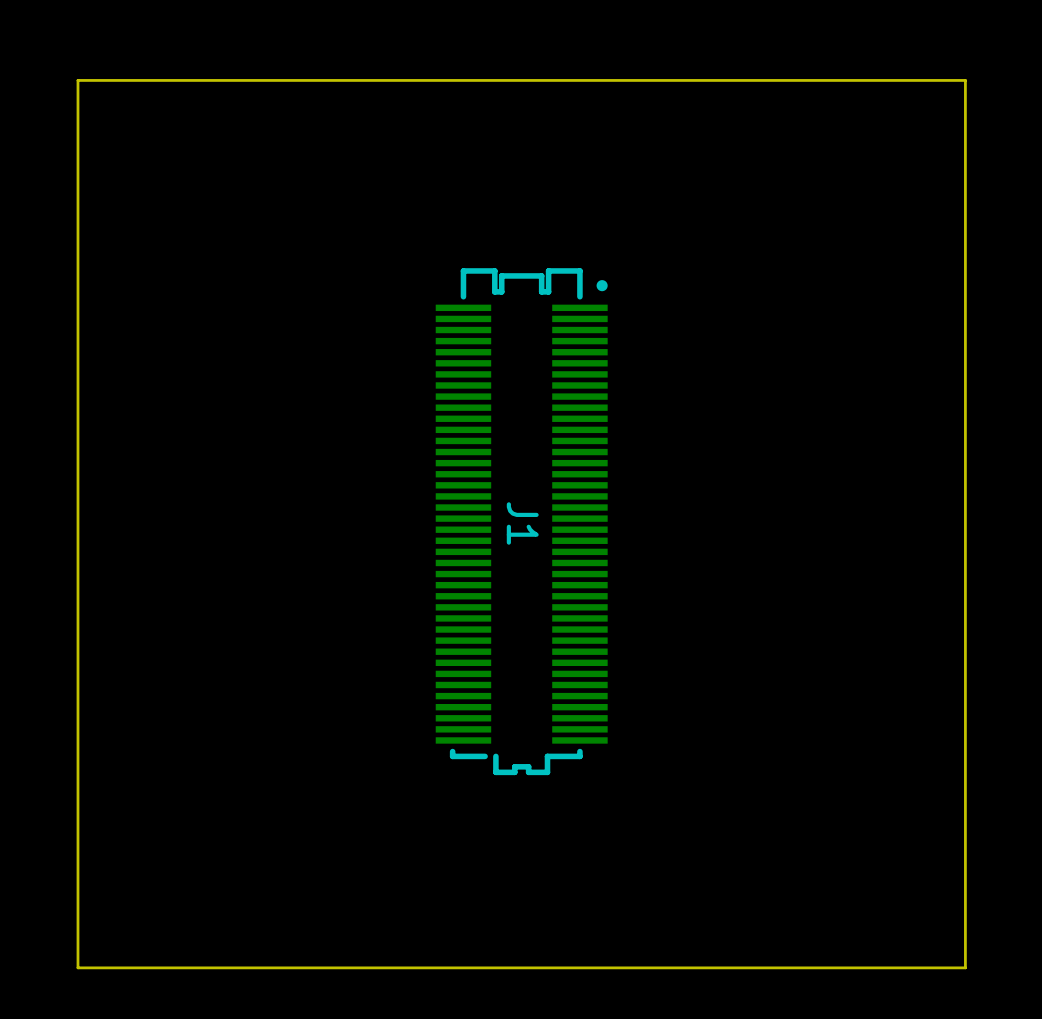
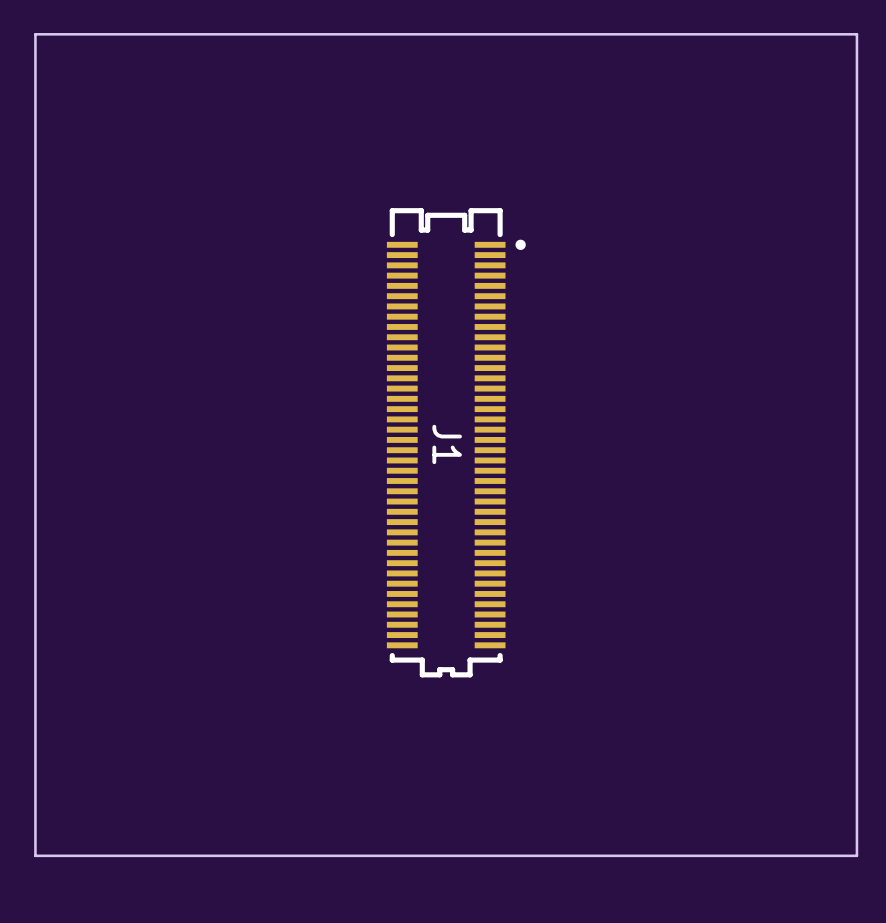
J1 footprint: [435, 268, 608, 776] -> [386, 208, 526, 678]

